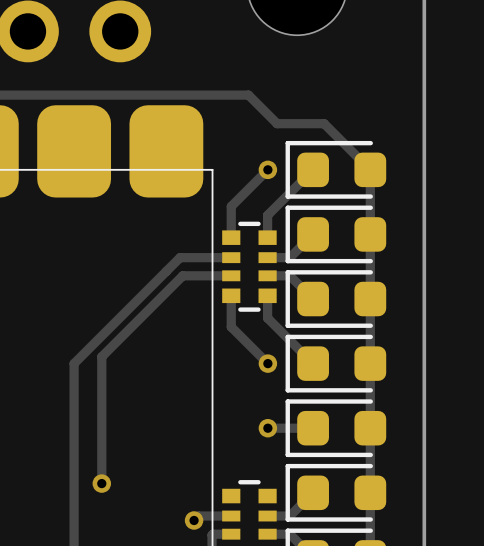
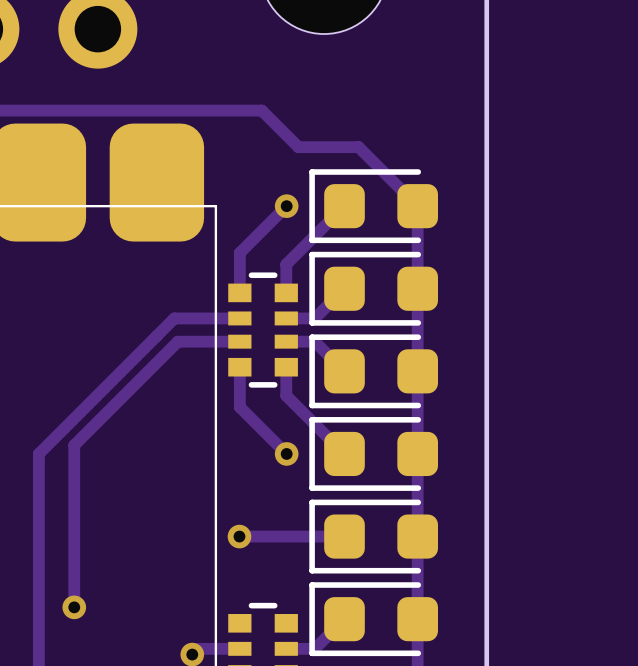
track: none -> (239, 536) (286, 536)
via position: (267, 428) -> (239, 536)

